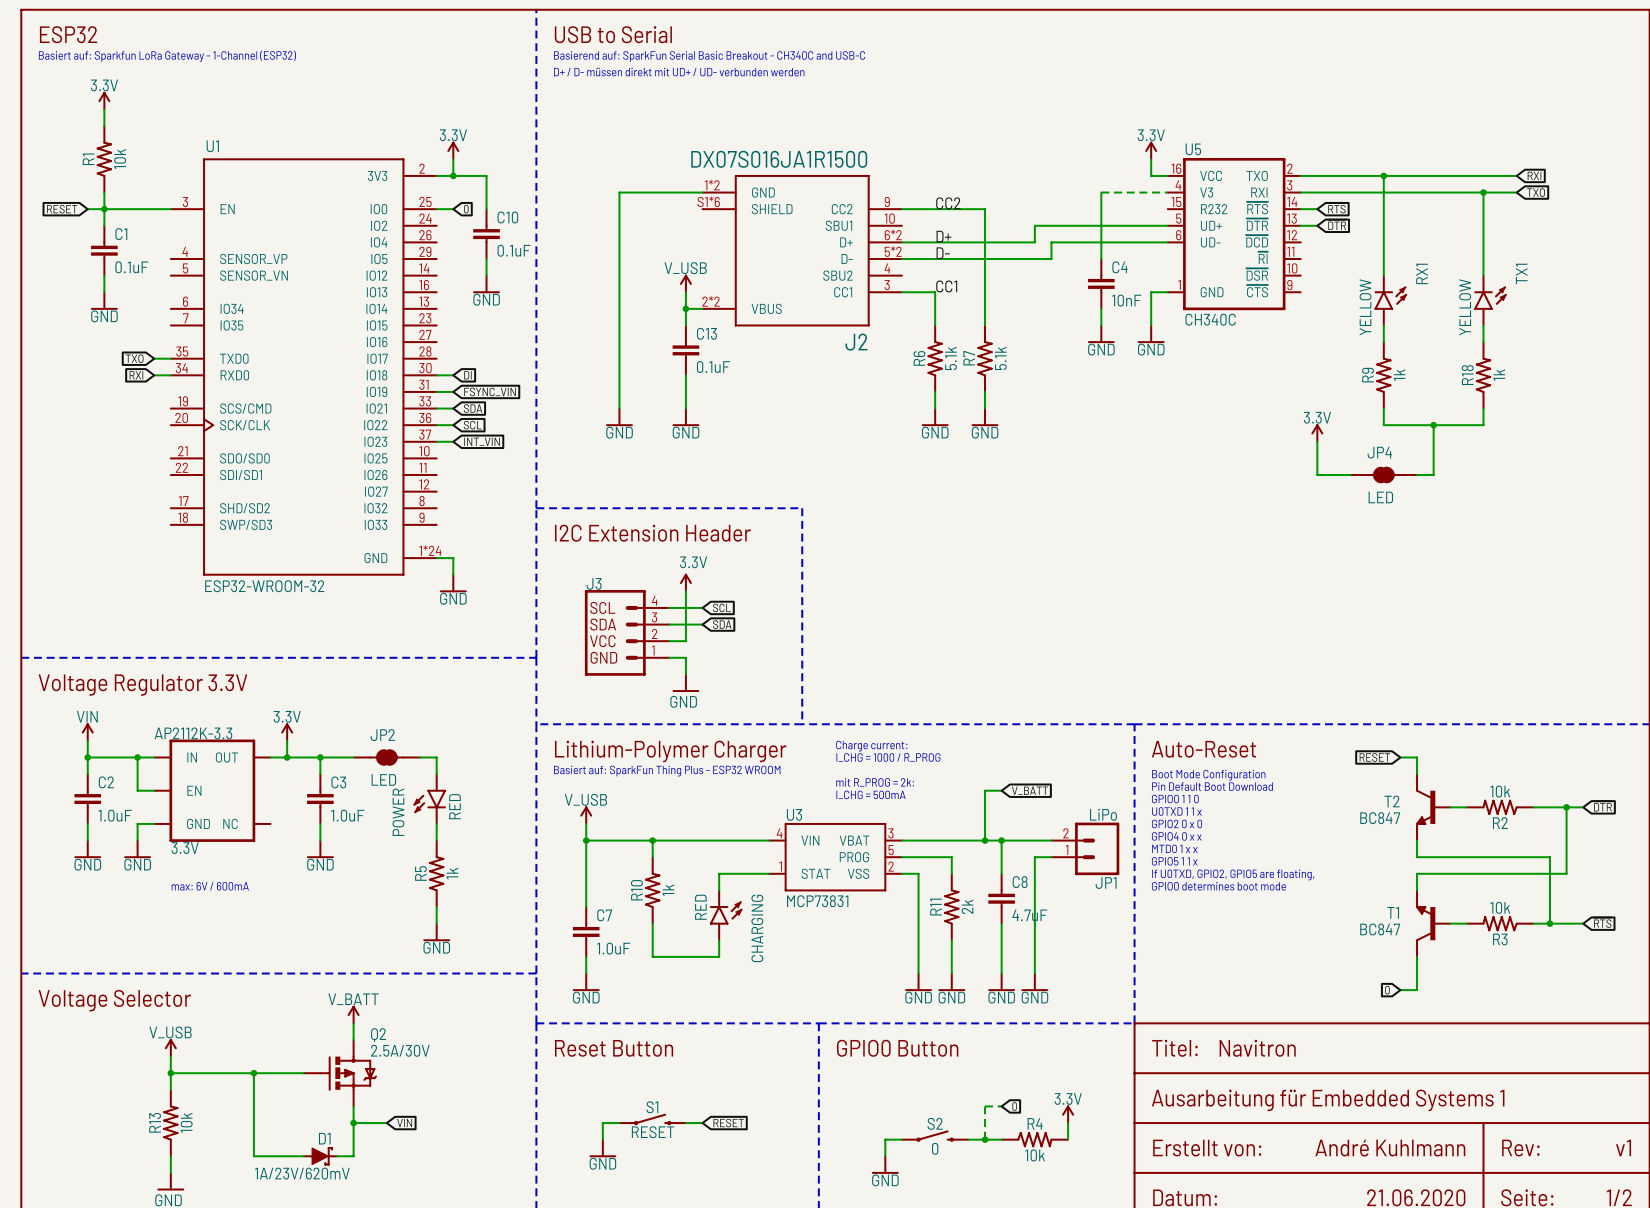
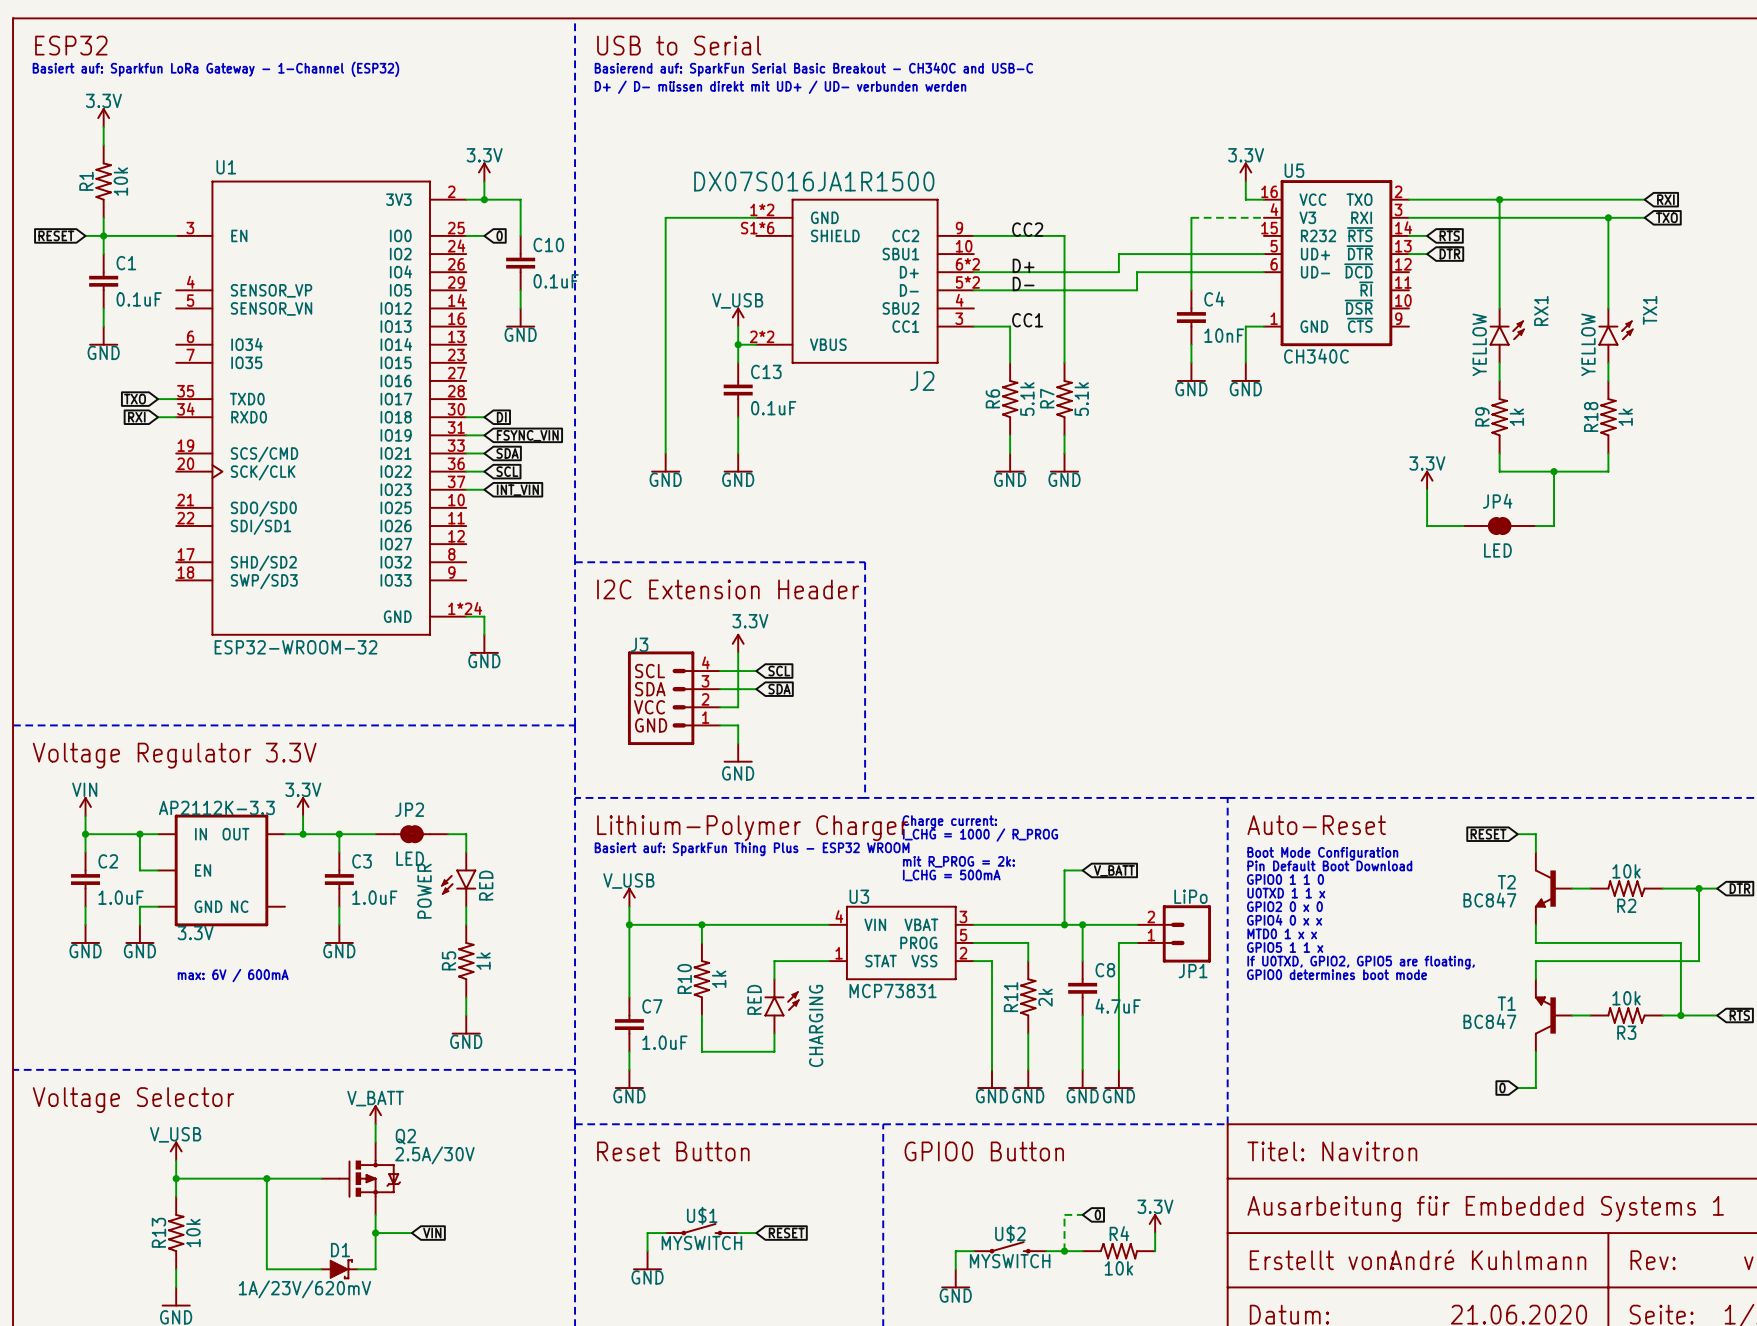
S1 name: S1 (652, 1107) -> U$1 (702, 1215)
S2 name: S2 (935, 1123) -> U$2 (1010, 1233)
S1 value: RESET (653, 1132) -> MYSWITCH (701, 1243)
S2 value: 0 (935, 1148) -> MYSWITCH (1010, 1261)

